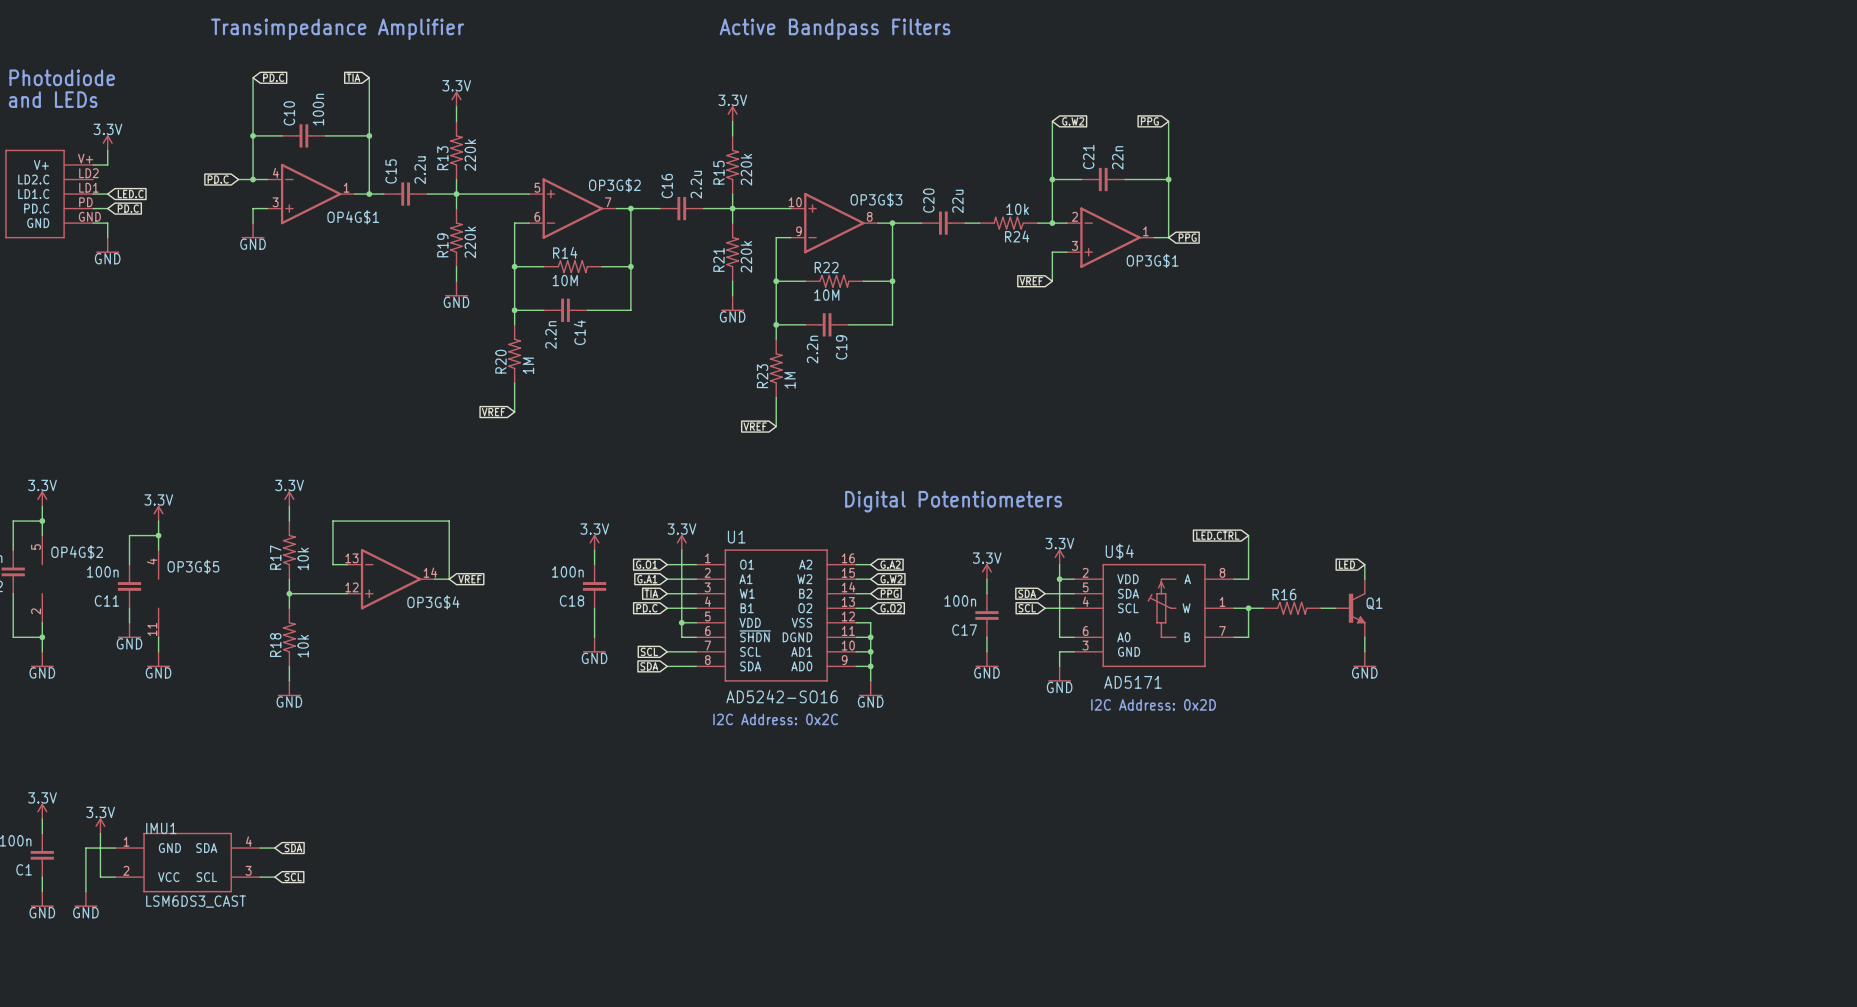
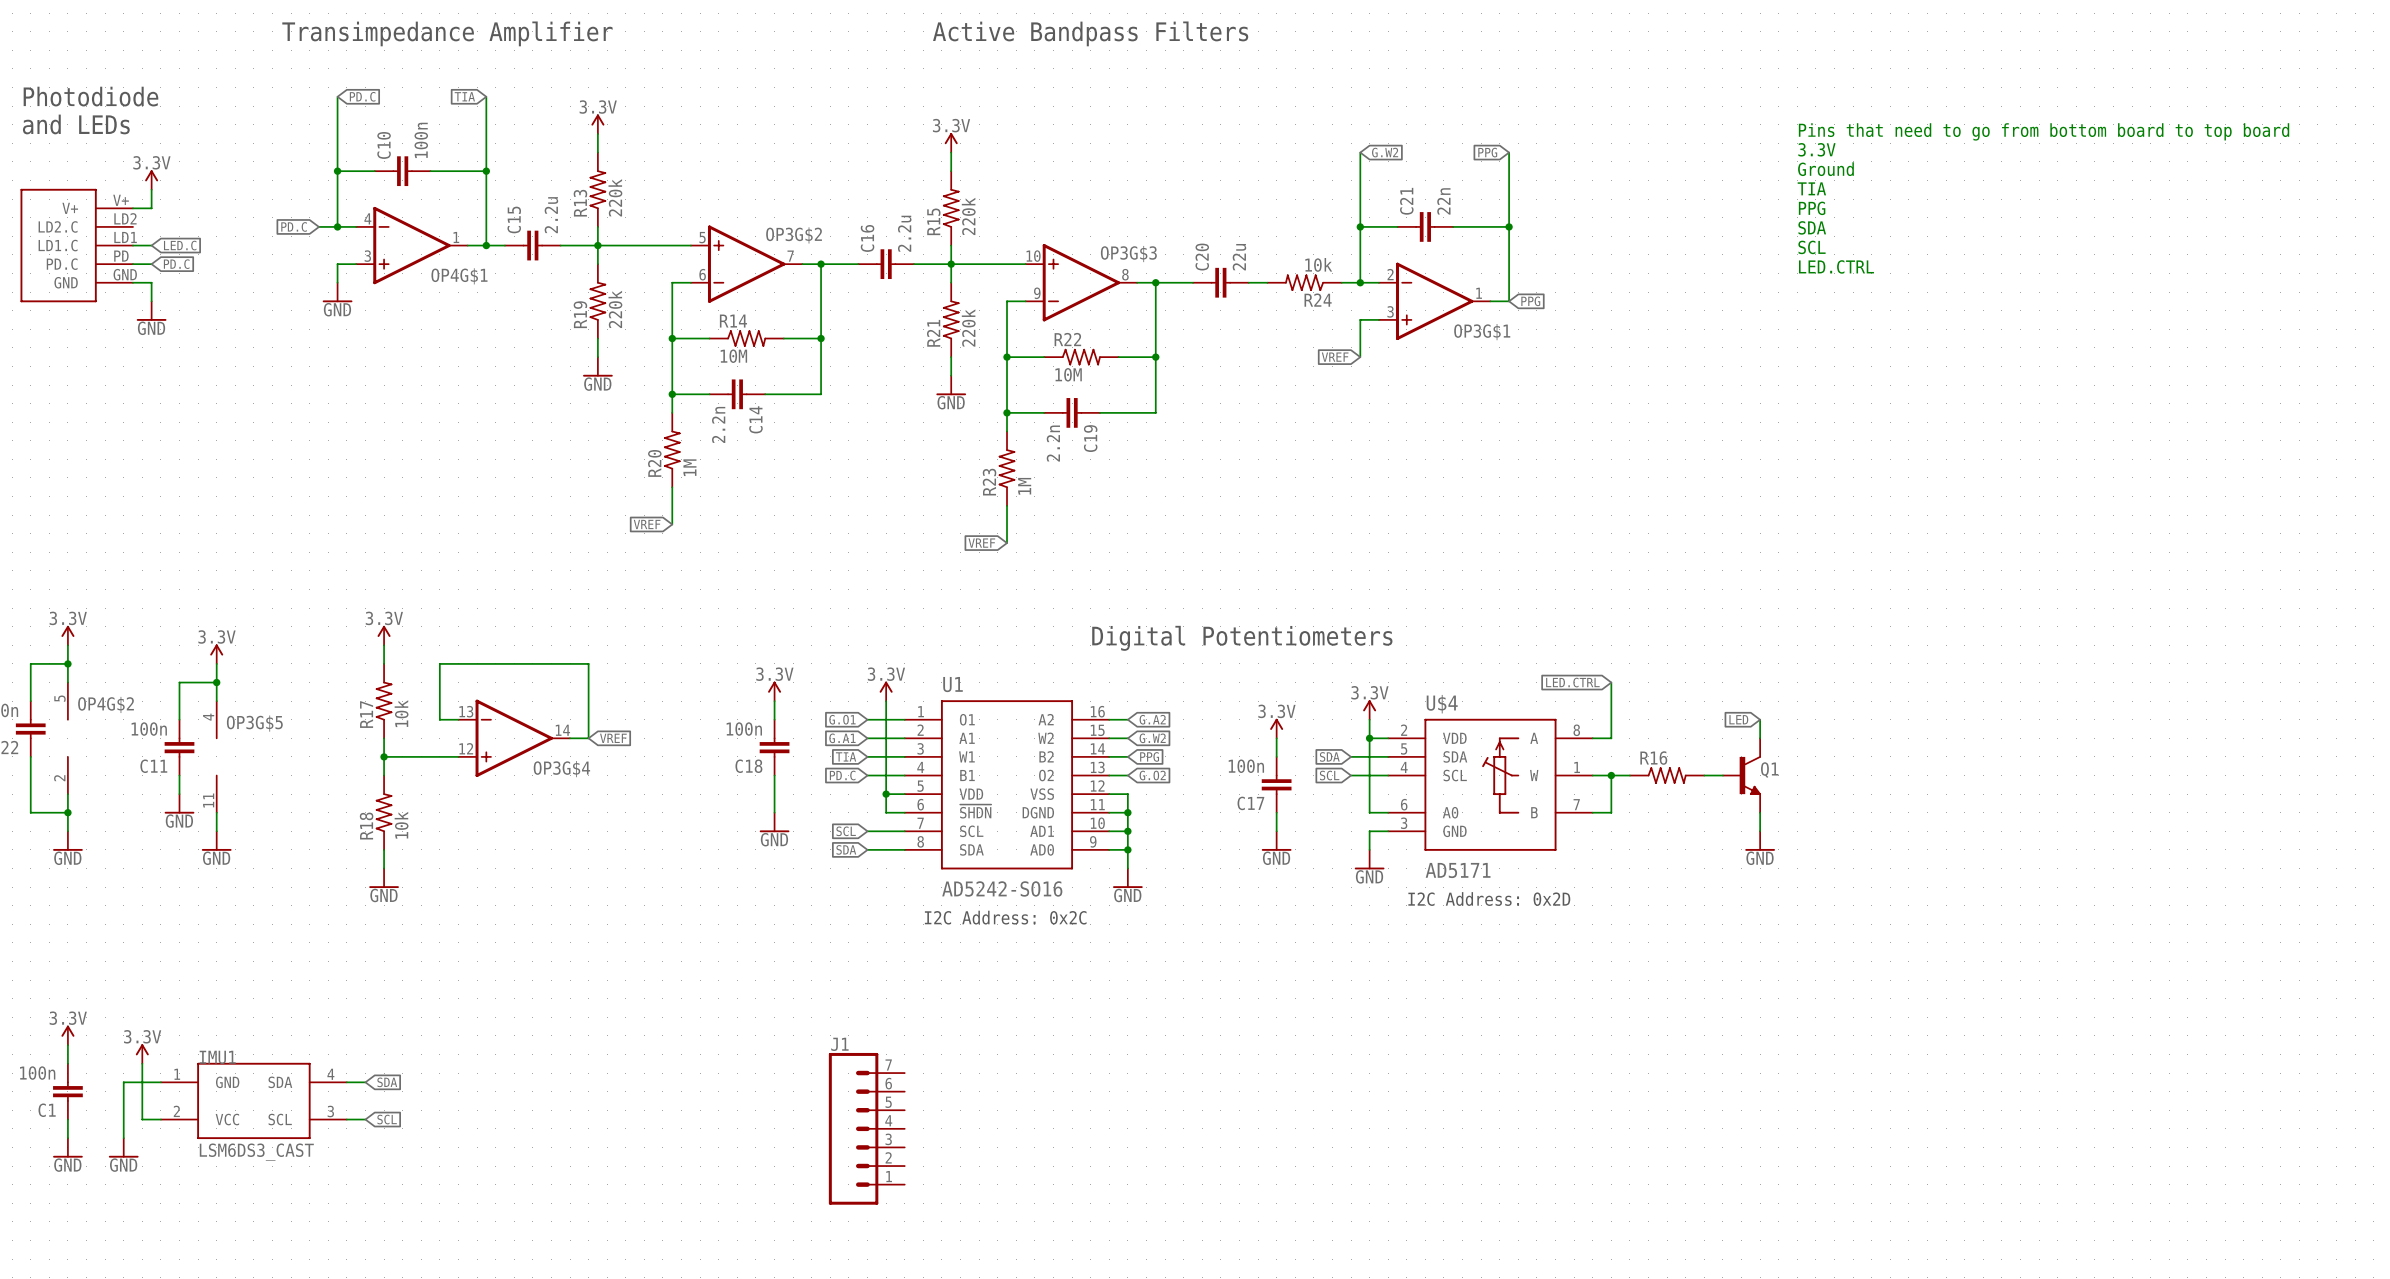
text: none -> Pins that need to go from bottom board to top board (2044, 131)
text: none -> 3.3V (1816, 149)
text: none -> Ground (1825, 169)
text: none -> TIA (1811, 188)
text: none -> PPG (1812, 208)
text: none -> SDA (1812, 227)
text: none -> SCL (1811, 247)
text: none -> LED.CTRL (1836, 266)
J1: none -> (866, 1128)

